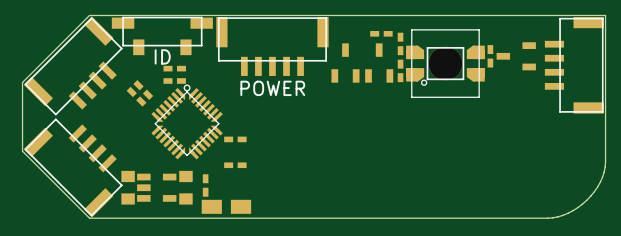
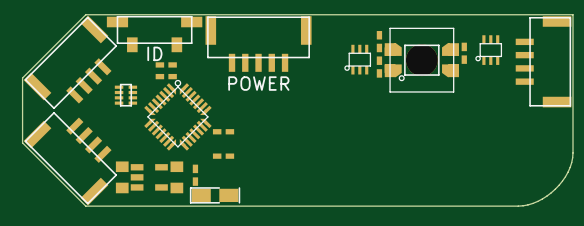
part: (381, 33) -> none
part footprint: [496, 42, 536, 71] -> [475, 35, 502, 65]
part footprint: [365, 43, 394, 83] -> [344, 44, 371, 75]
part: (345, 63) -> none
part footprint: [126, 86, 147, 107] -> [114, 83, 138, 107]
part: (143, 89) -> none
part footprint: [201, 199, 252, 214] -> [189, 187, 241, 204]

